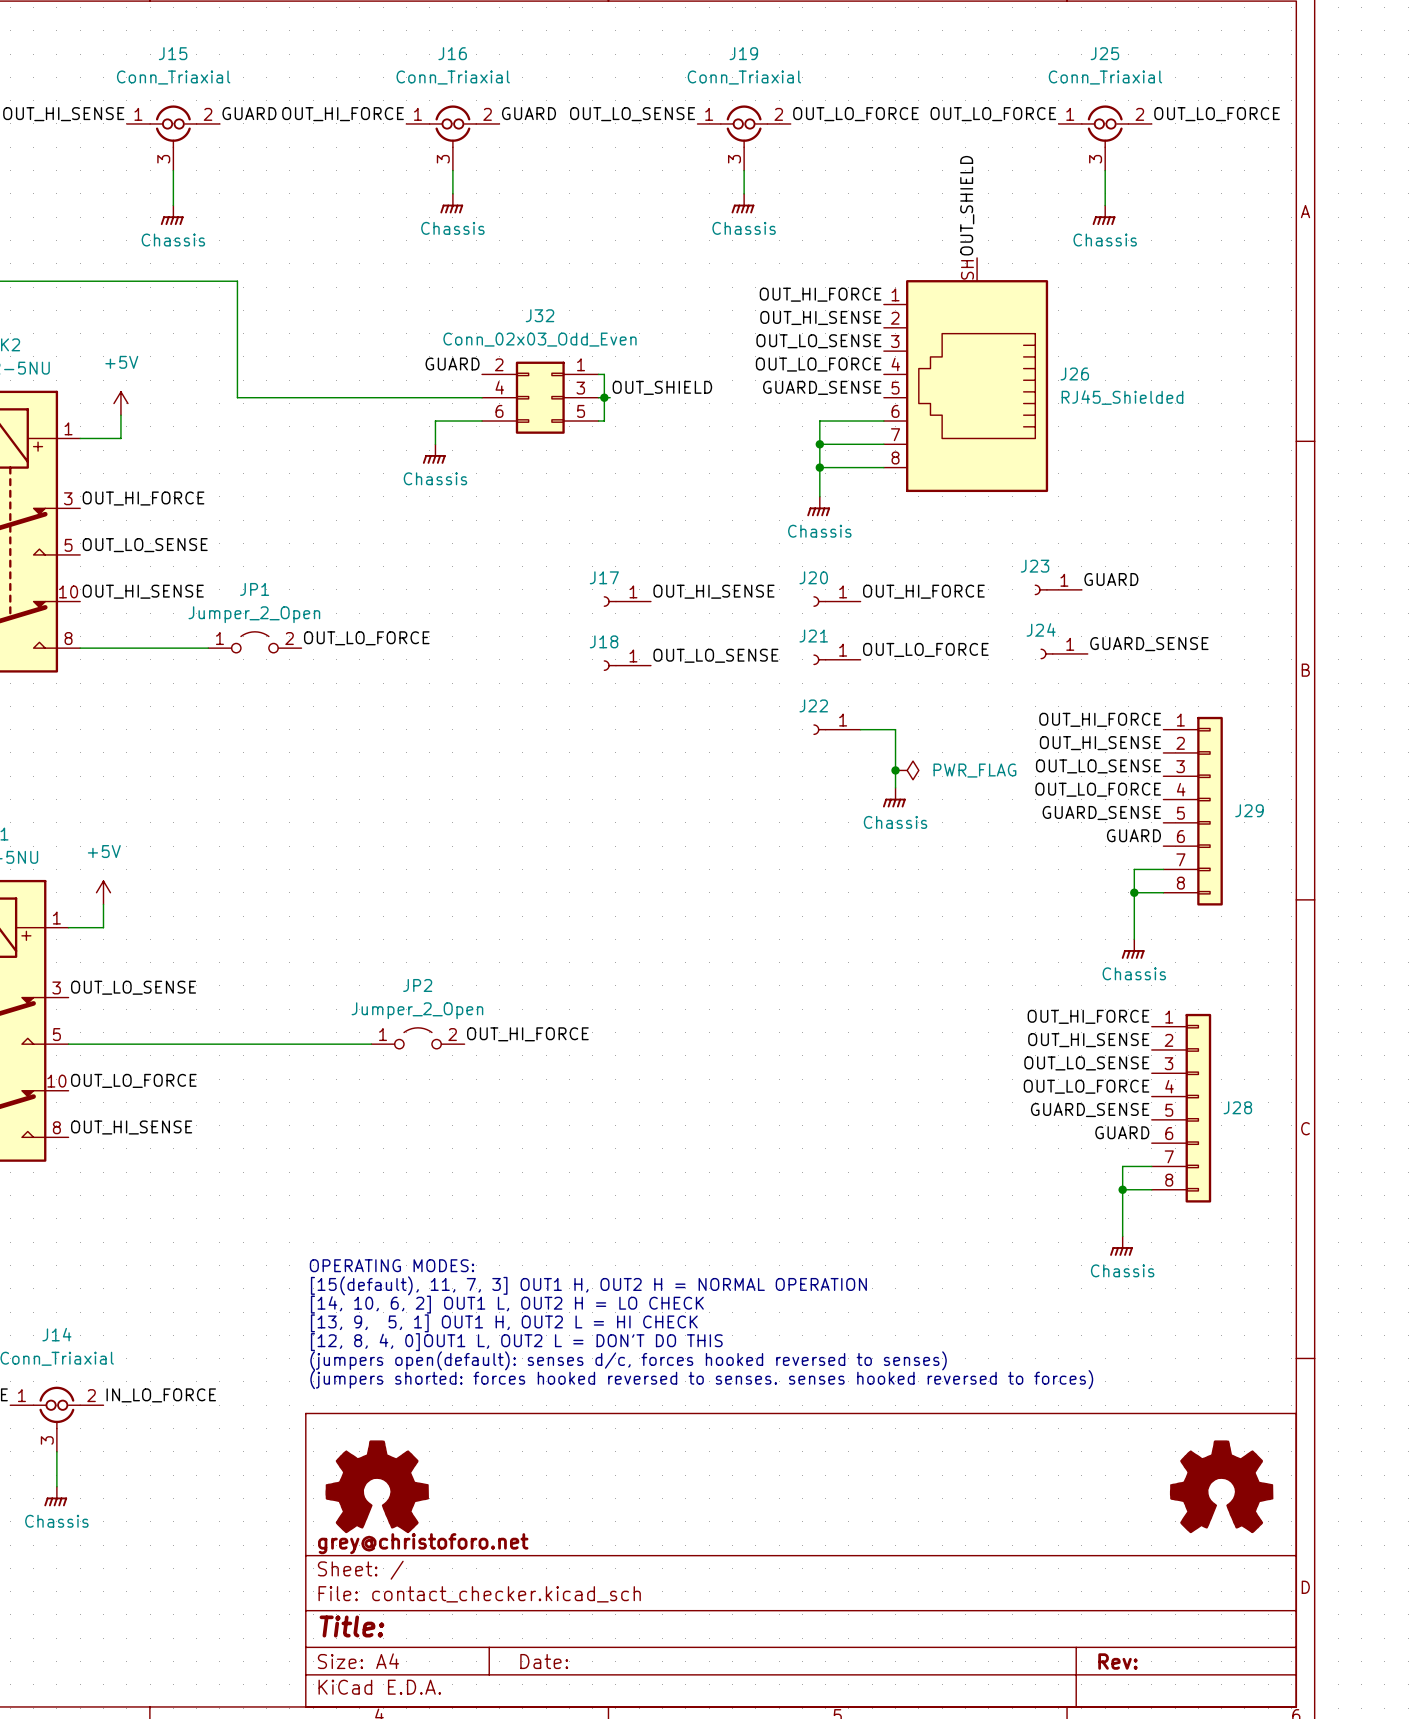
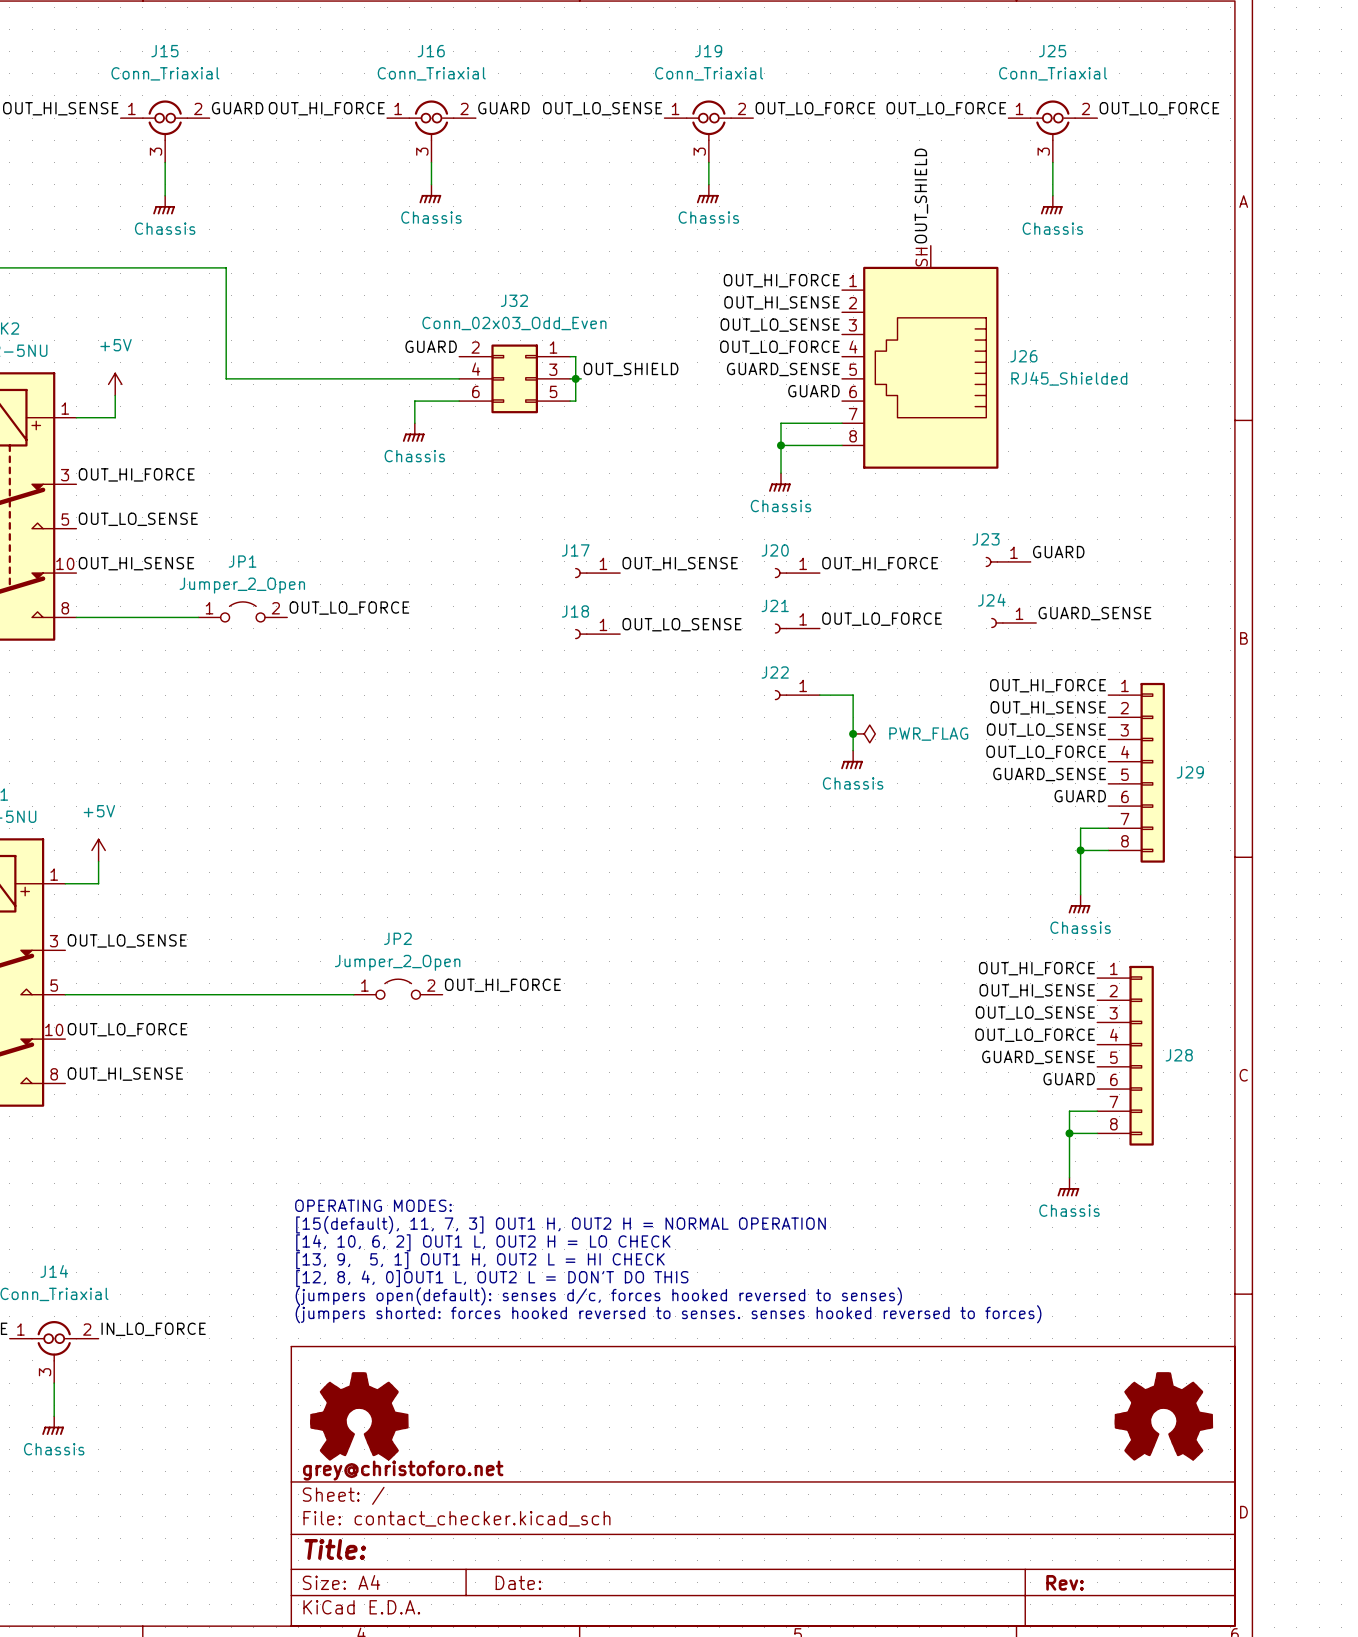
label: none -> GUARD (813, 391)
wire: (883, 421) (819, 421) (819, 444) -> none
junction: (819, 444) -> none

